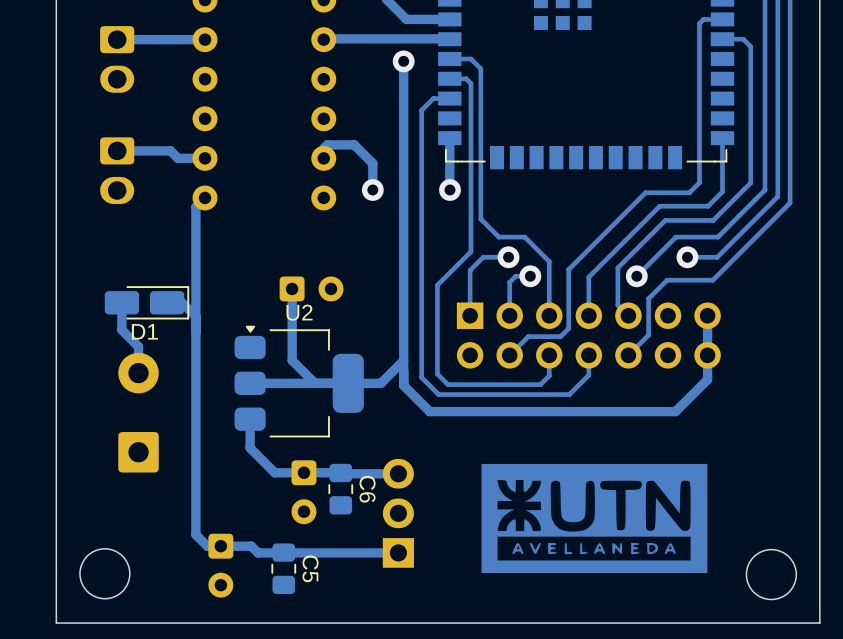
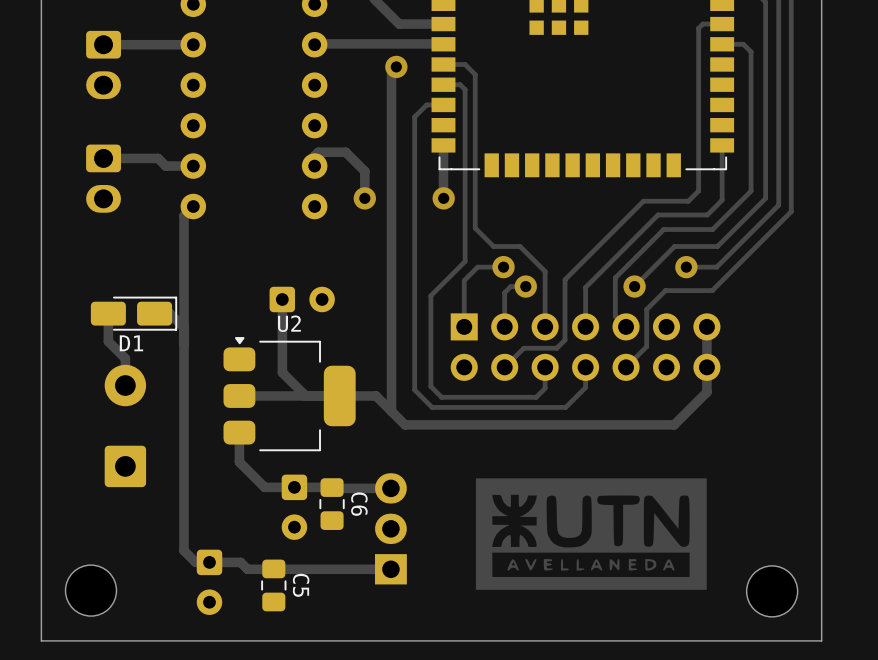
track: none -> (391, 67) (391, 411)
track: (403, 61) (403, 385) (429, 411) -> none
track: (403, 360) (380, 383) -> (423, 424) (405, 424) (376, 395) (373, 395)

